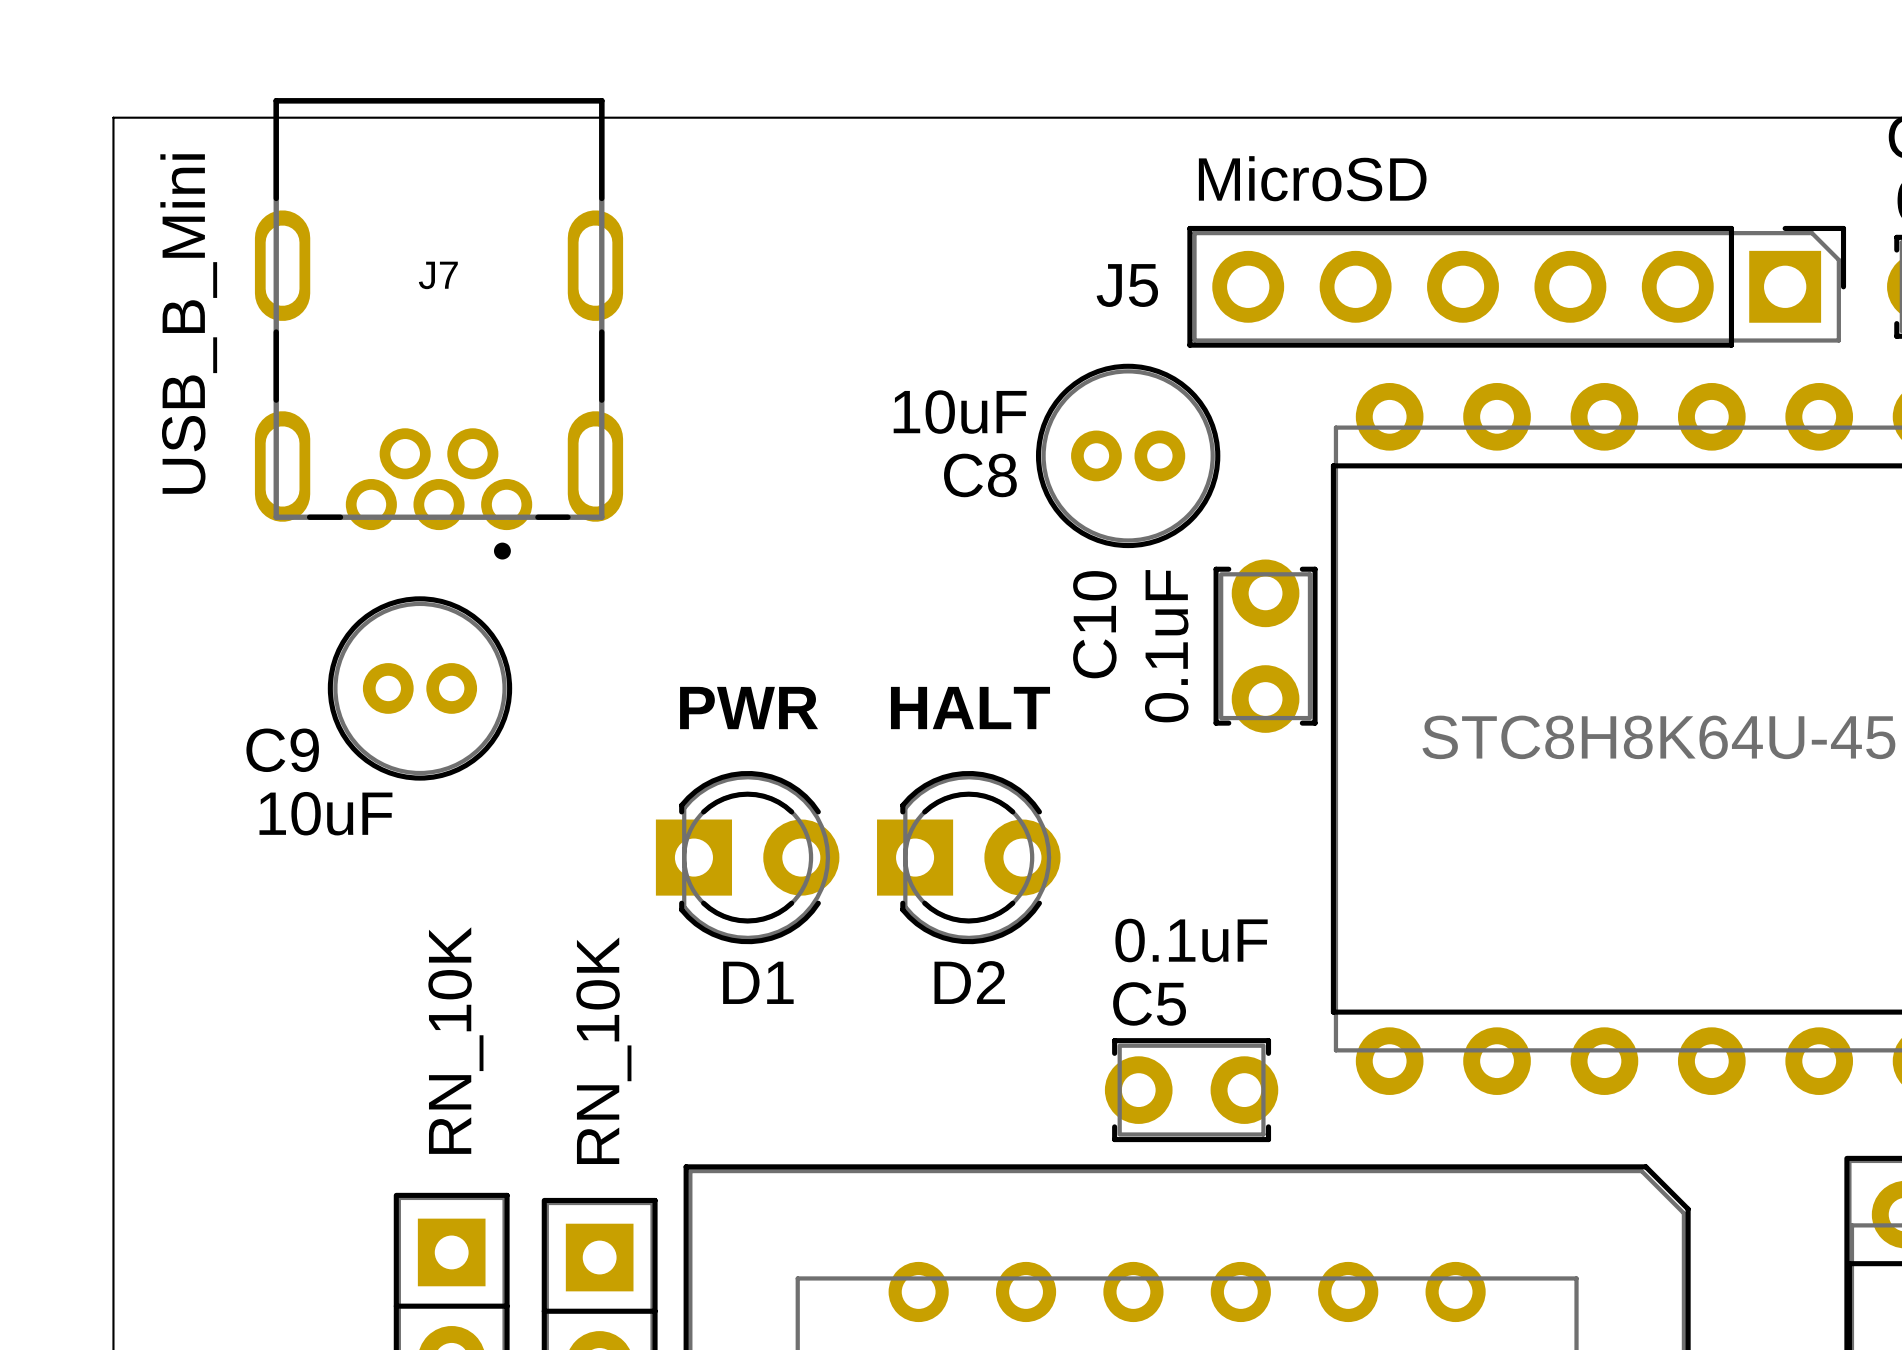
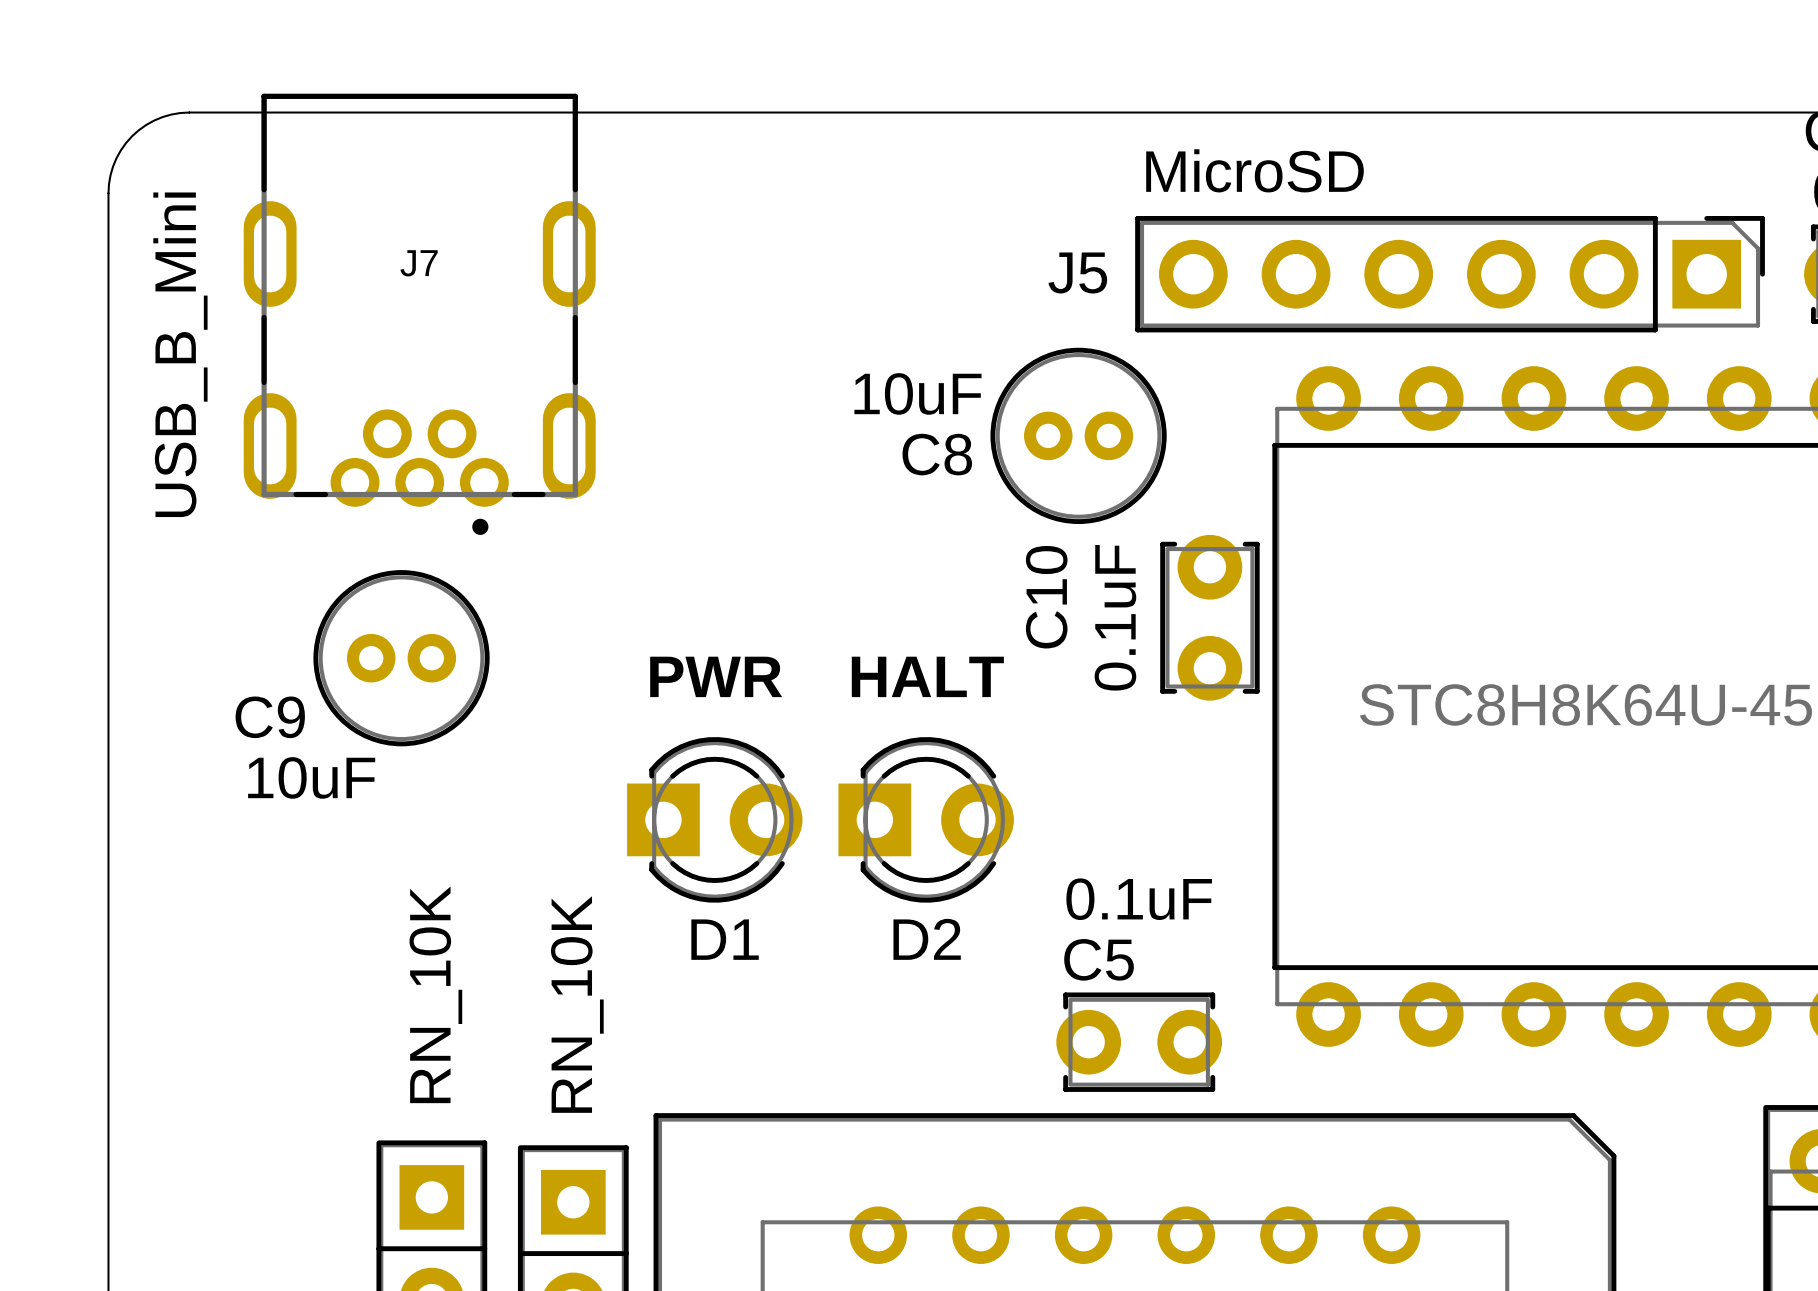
board edge: (198, 117) (113, 117) (113, 202) -> (189, 112) (171, 114) (154, 120) (132, 136) (116, 158) (110, 175) (108, 193)
J7 value position: USB_B_Mini (188, 324) -> USB_B_Mini (180, 354)

